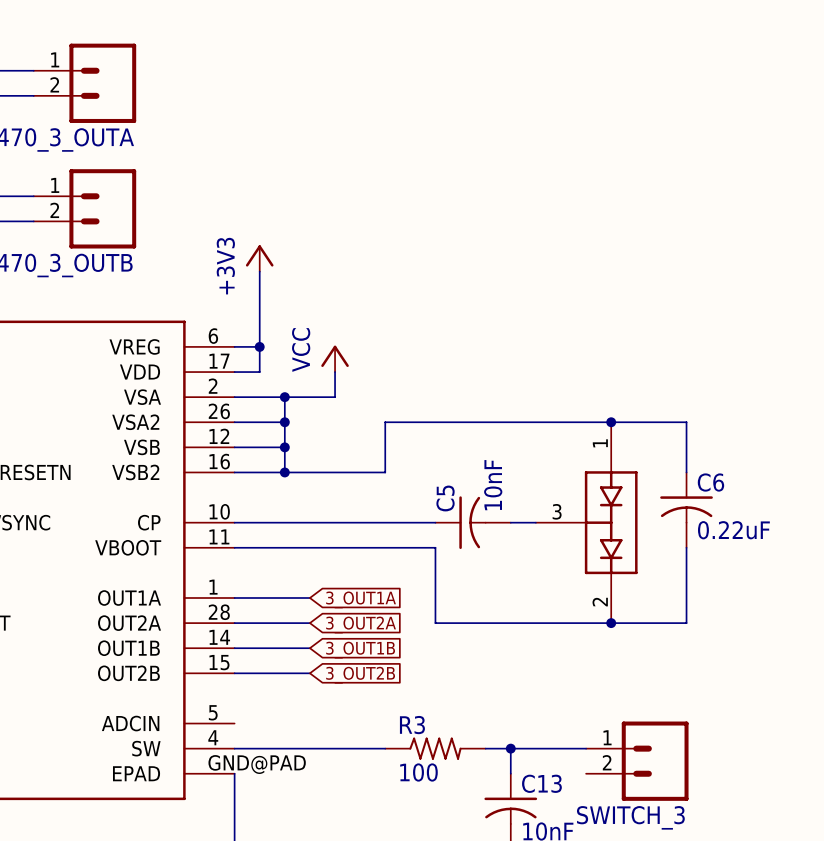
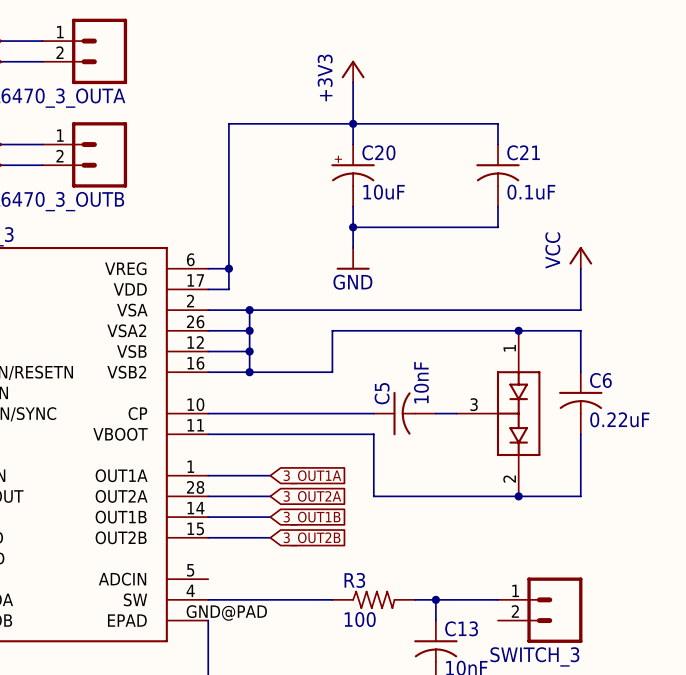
wire: none -> (353, 82) (353, 144)
junction: none -> (353, 123)
wire: none -> (497, 144) (497, 123) (228, 123) (228, 206)
C20: none -> 10uF (353, 175)
C21: none -> 0.1uF (497, 175)
power symbol position: +3V3 (259, 258) -> +3V3 (353, 71)
wire: none -> (353, 206) (353, 248)
wire: none -> (497, 206) (497, 227) (353, 227)
junction: none -> (353, 227)
power symbol: none -> VCC (580, 257)
power symbol: none -> GND (353, 258)
power symbol: VCC (335, 358) -> none
wire: (335, 372) (335, 397) -> (580, 268) (580, 310) (291, 310)

